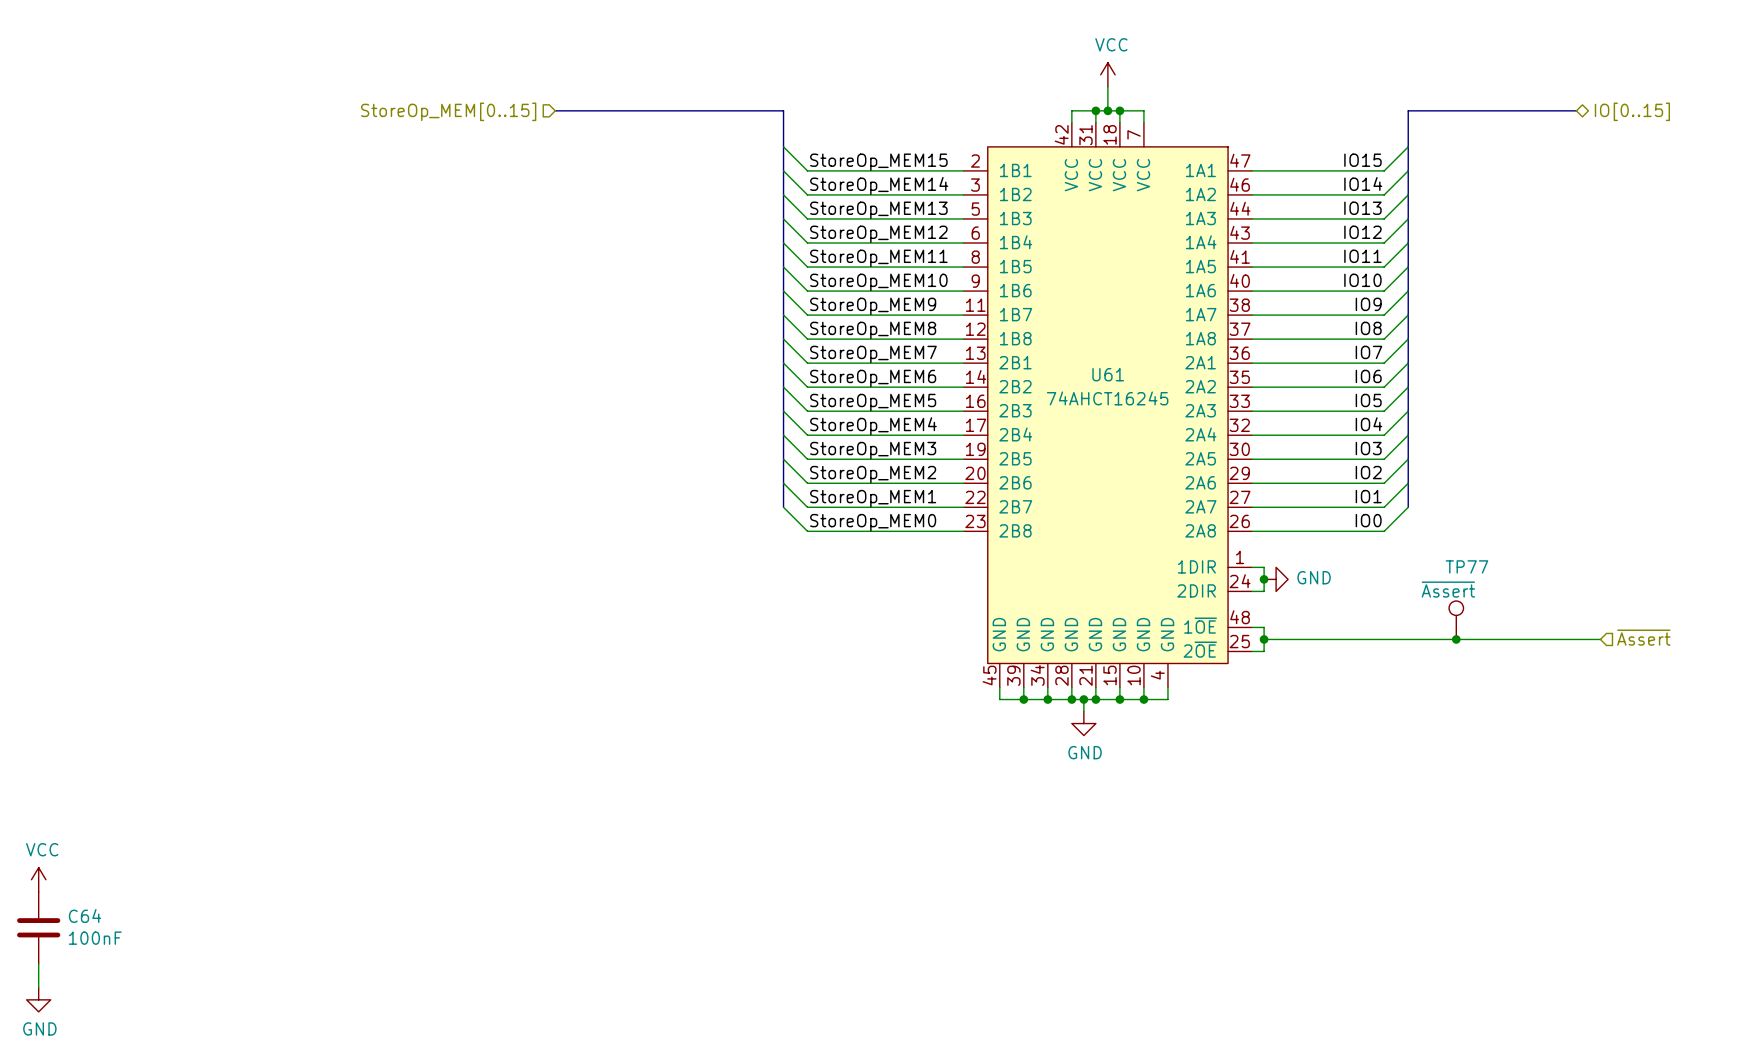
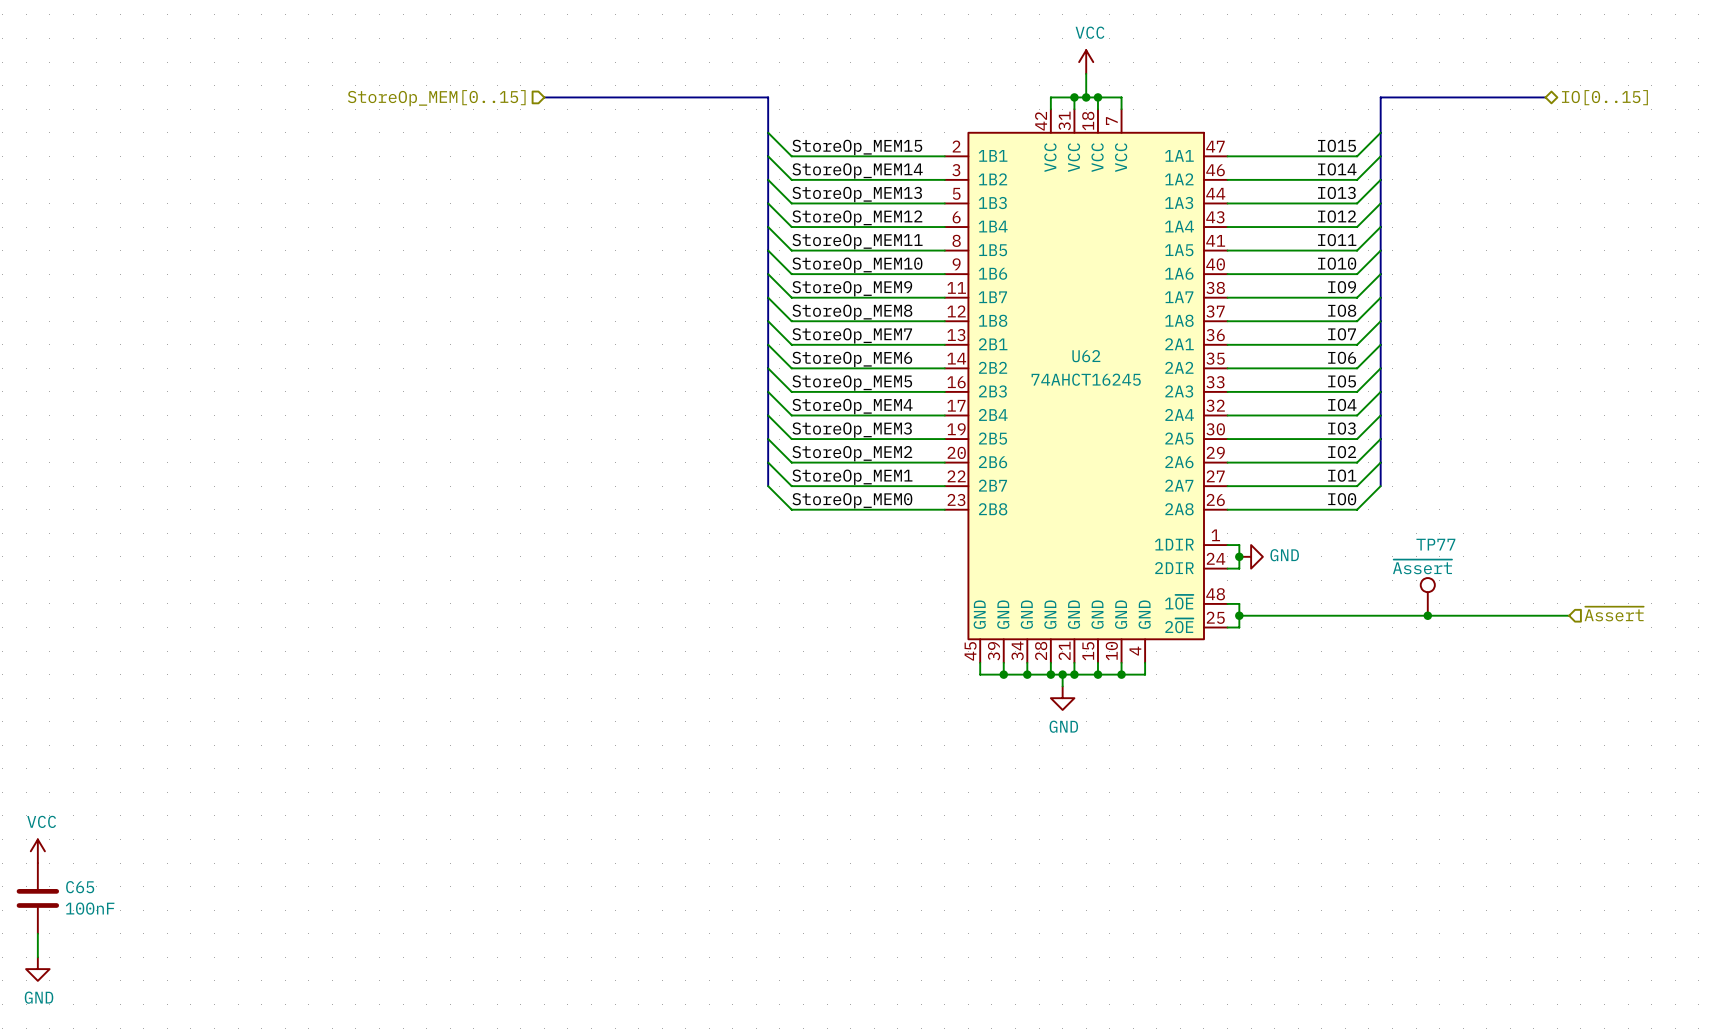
U61 name: U61 (1108, 374) -> U62 (1086, 356)
C64 name: C64 (84, 916) -> C65 (80, 887)

